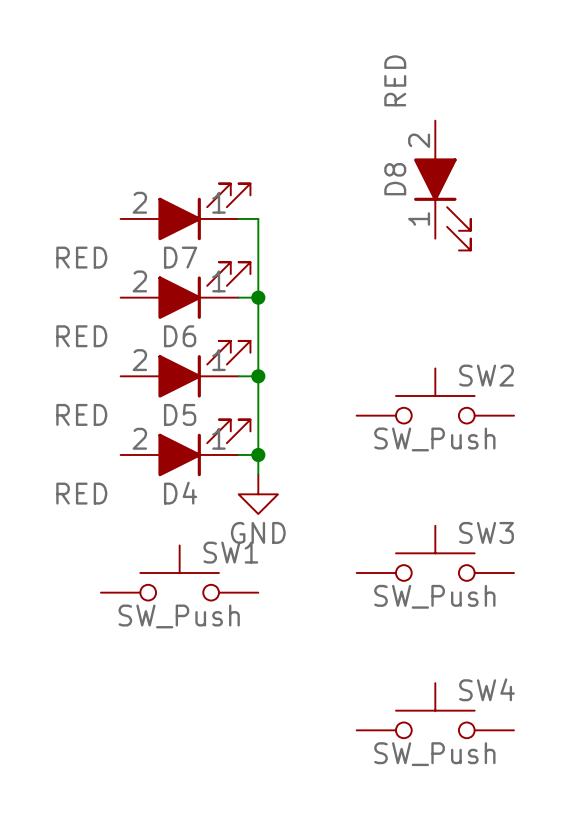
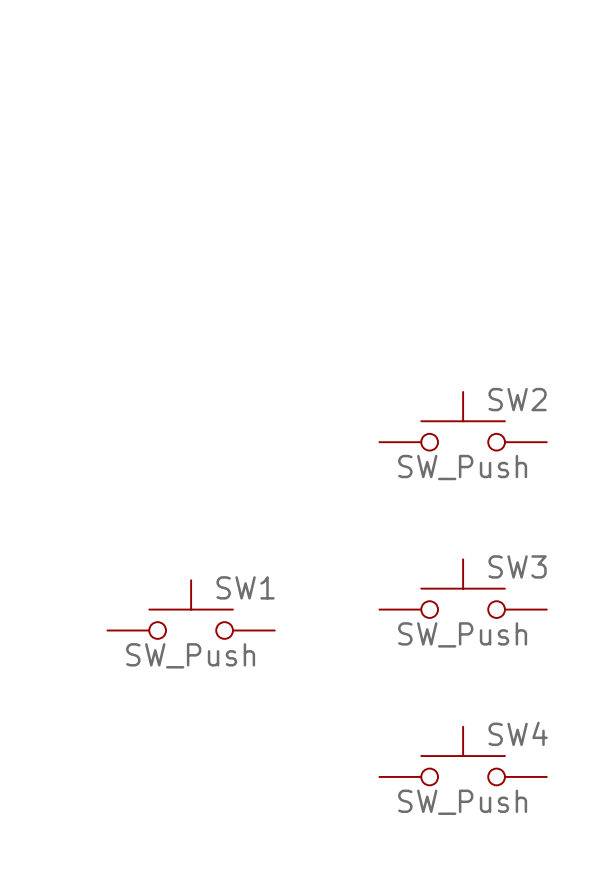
D8: RED (442, 185) -> none
D7: RED (185, 211) -> none
wire: (238, 218) (258, 218) (258, 474) -> none
D6: RED (185, 290) -> none
wire: (238, 297) (258, 297) -> none
junction: (258, 297) -> none
D5: RED (185, 369) -> none
wire: (238, 376) (258, 376) -> none
junction: (258, 376) -> none
D4: RED (185, 447) -> none
wire: (238, 454) (258, 454) -> none
junction: (258, 454) -> none
power symbol: GND (258, 494) -> none

